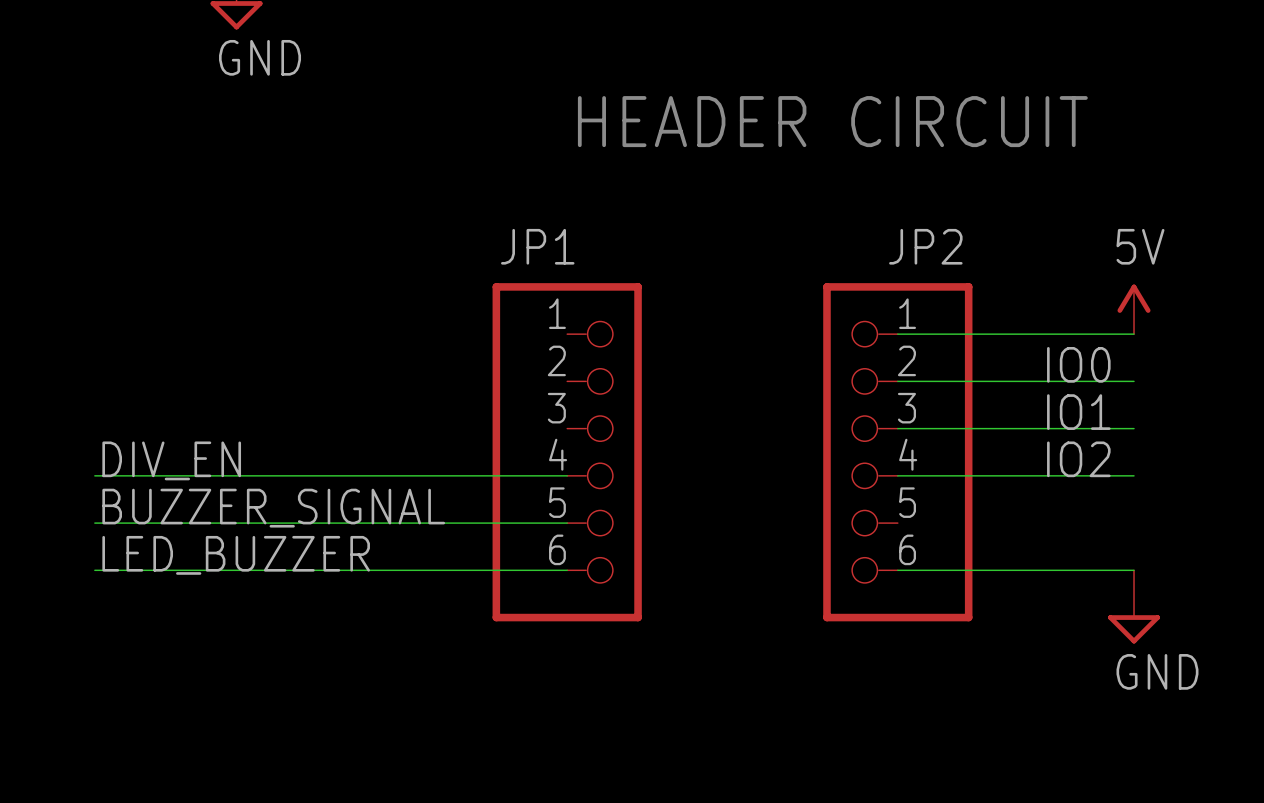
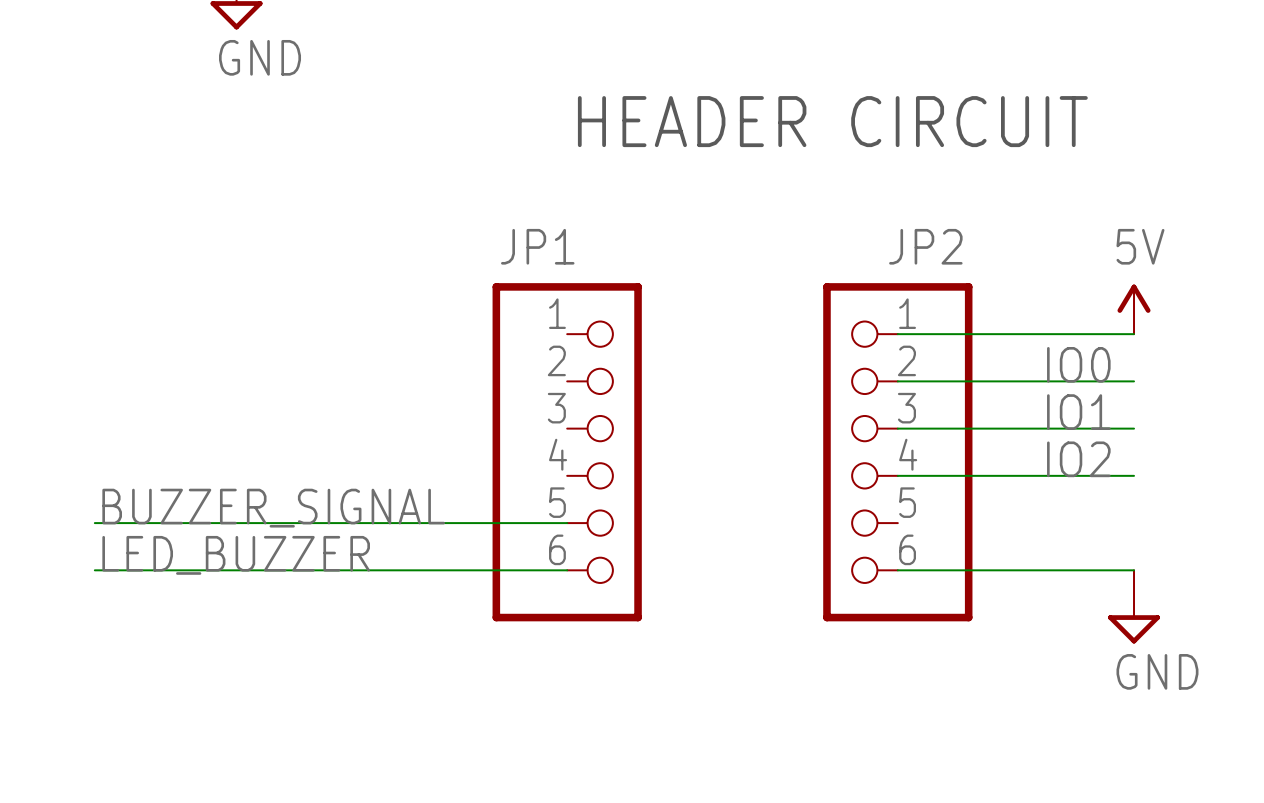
label: DIV_EN (171, 460) -> none
wire: (94, 475) (567, 475) -> none

